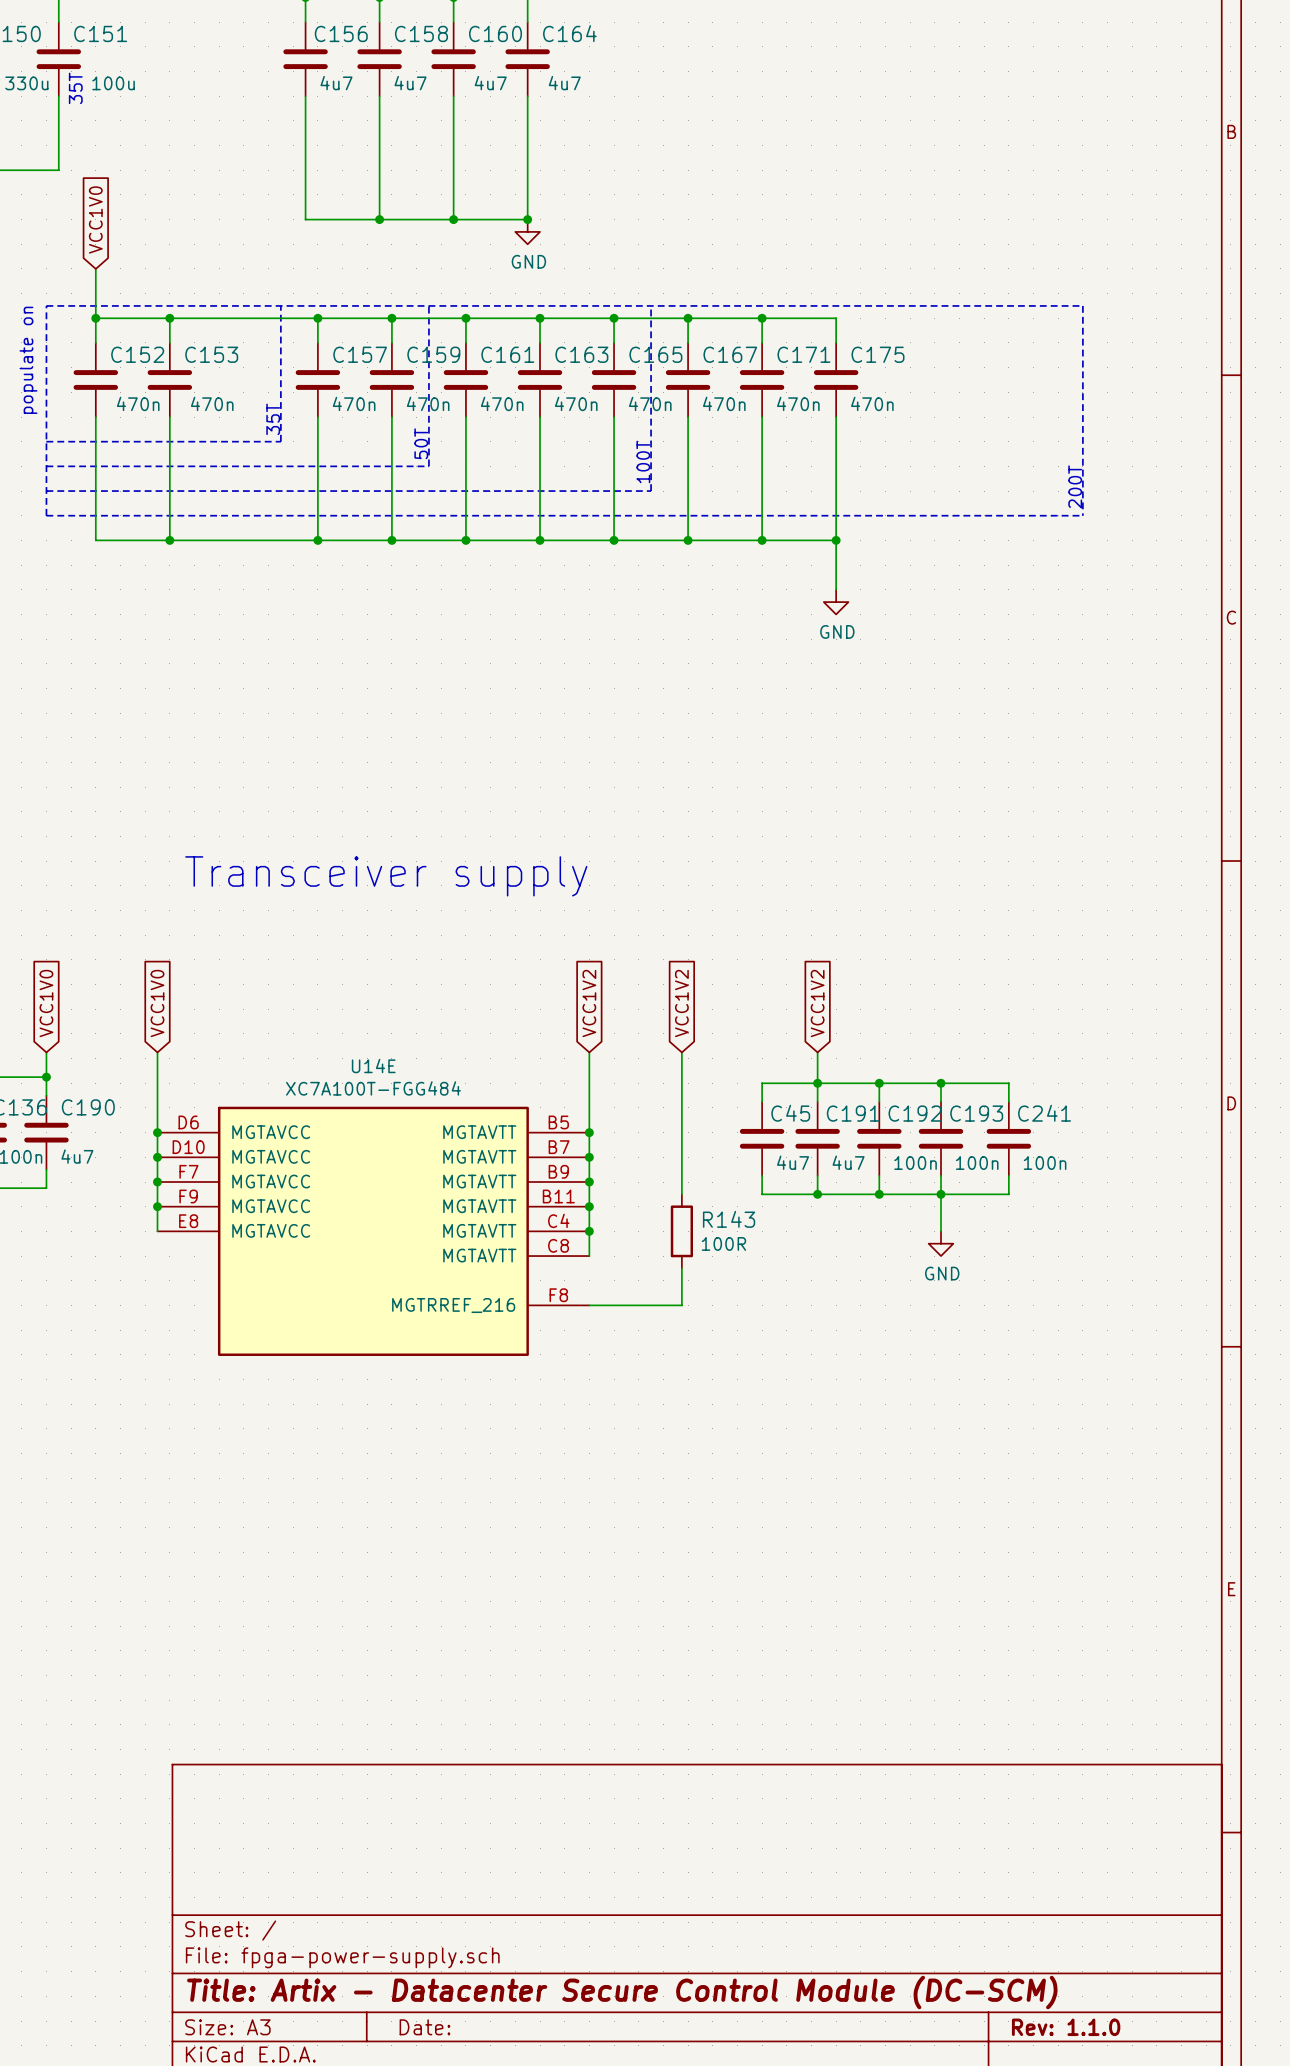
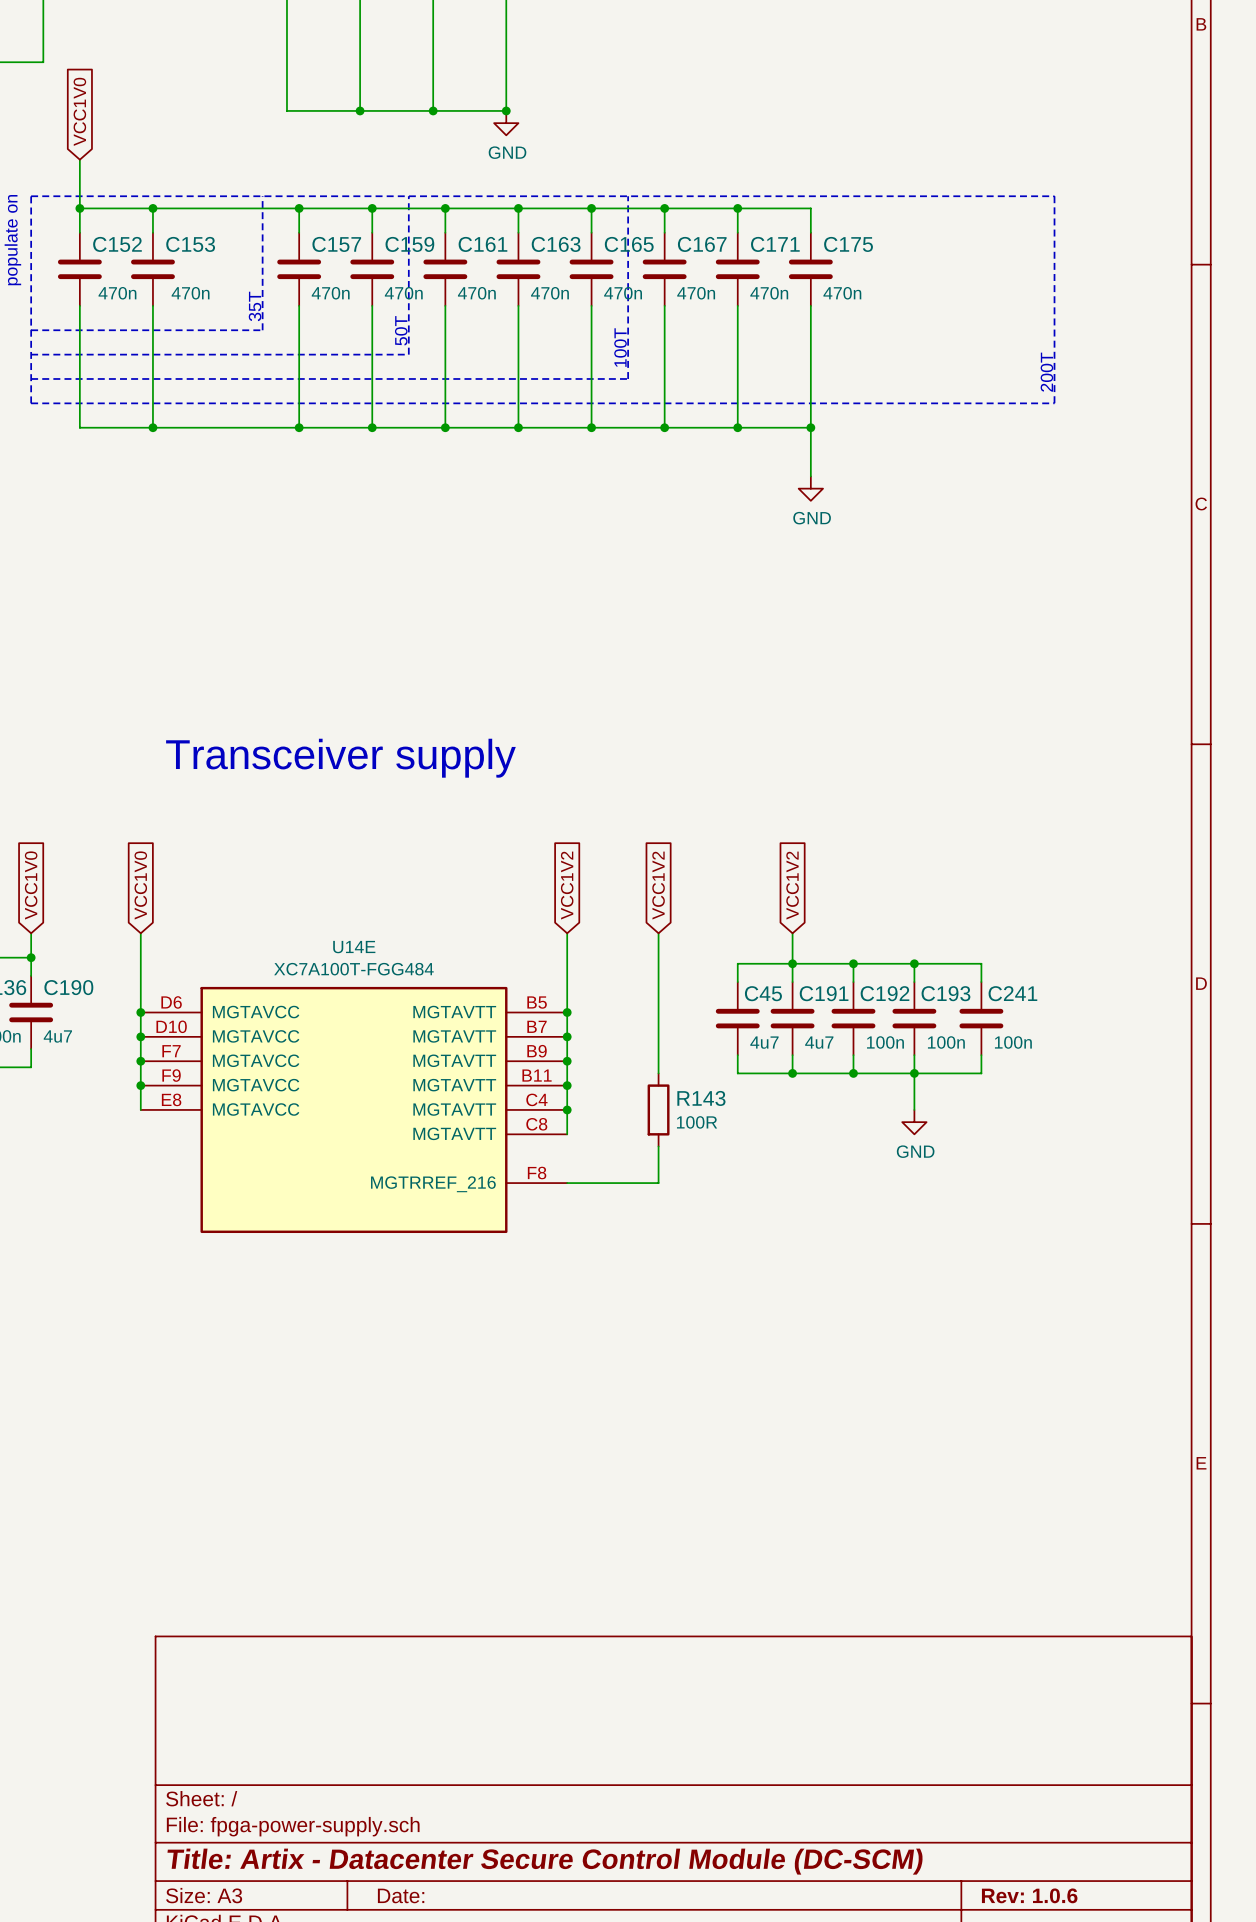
title block: Rev: 1.1.0 (1066, 2027) -> Rev: 1.0.6 (1029, 1895)

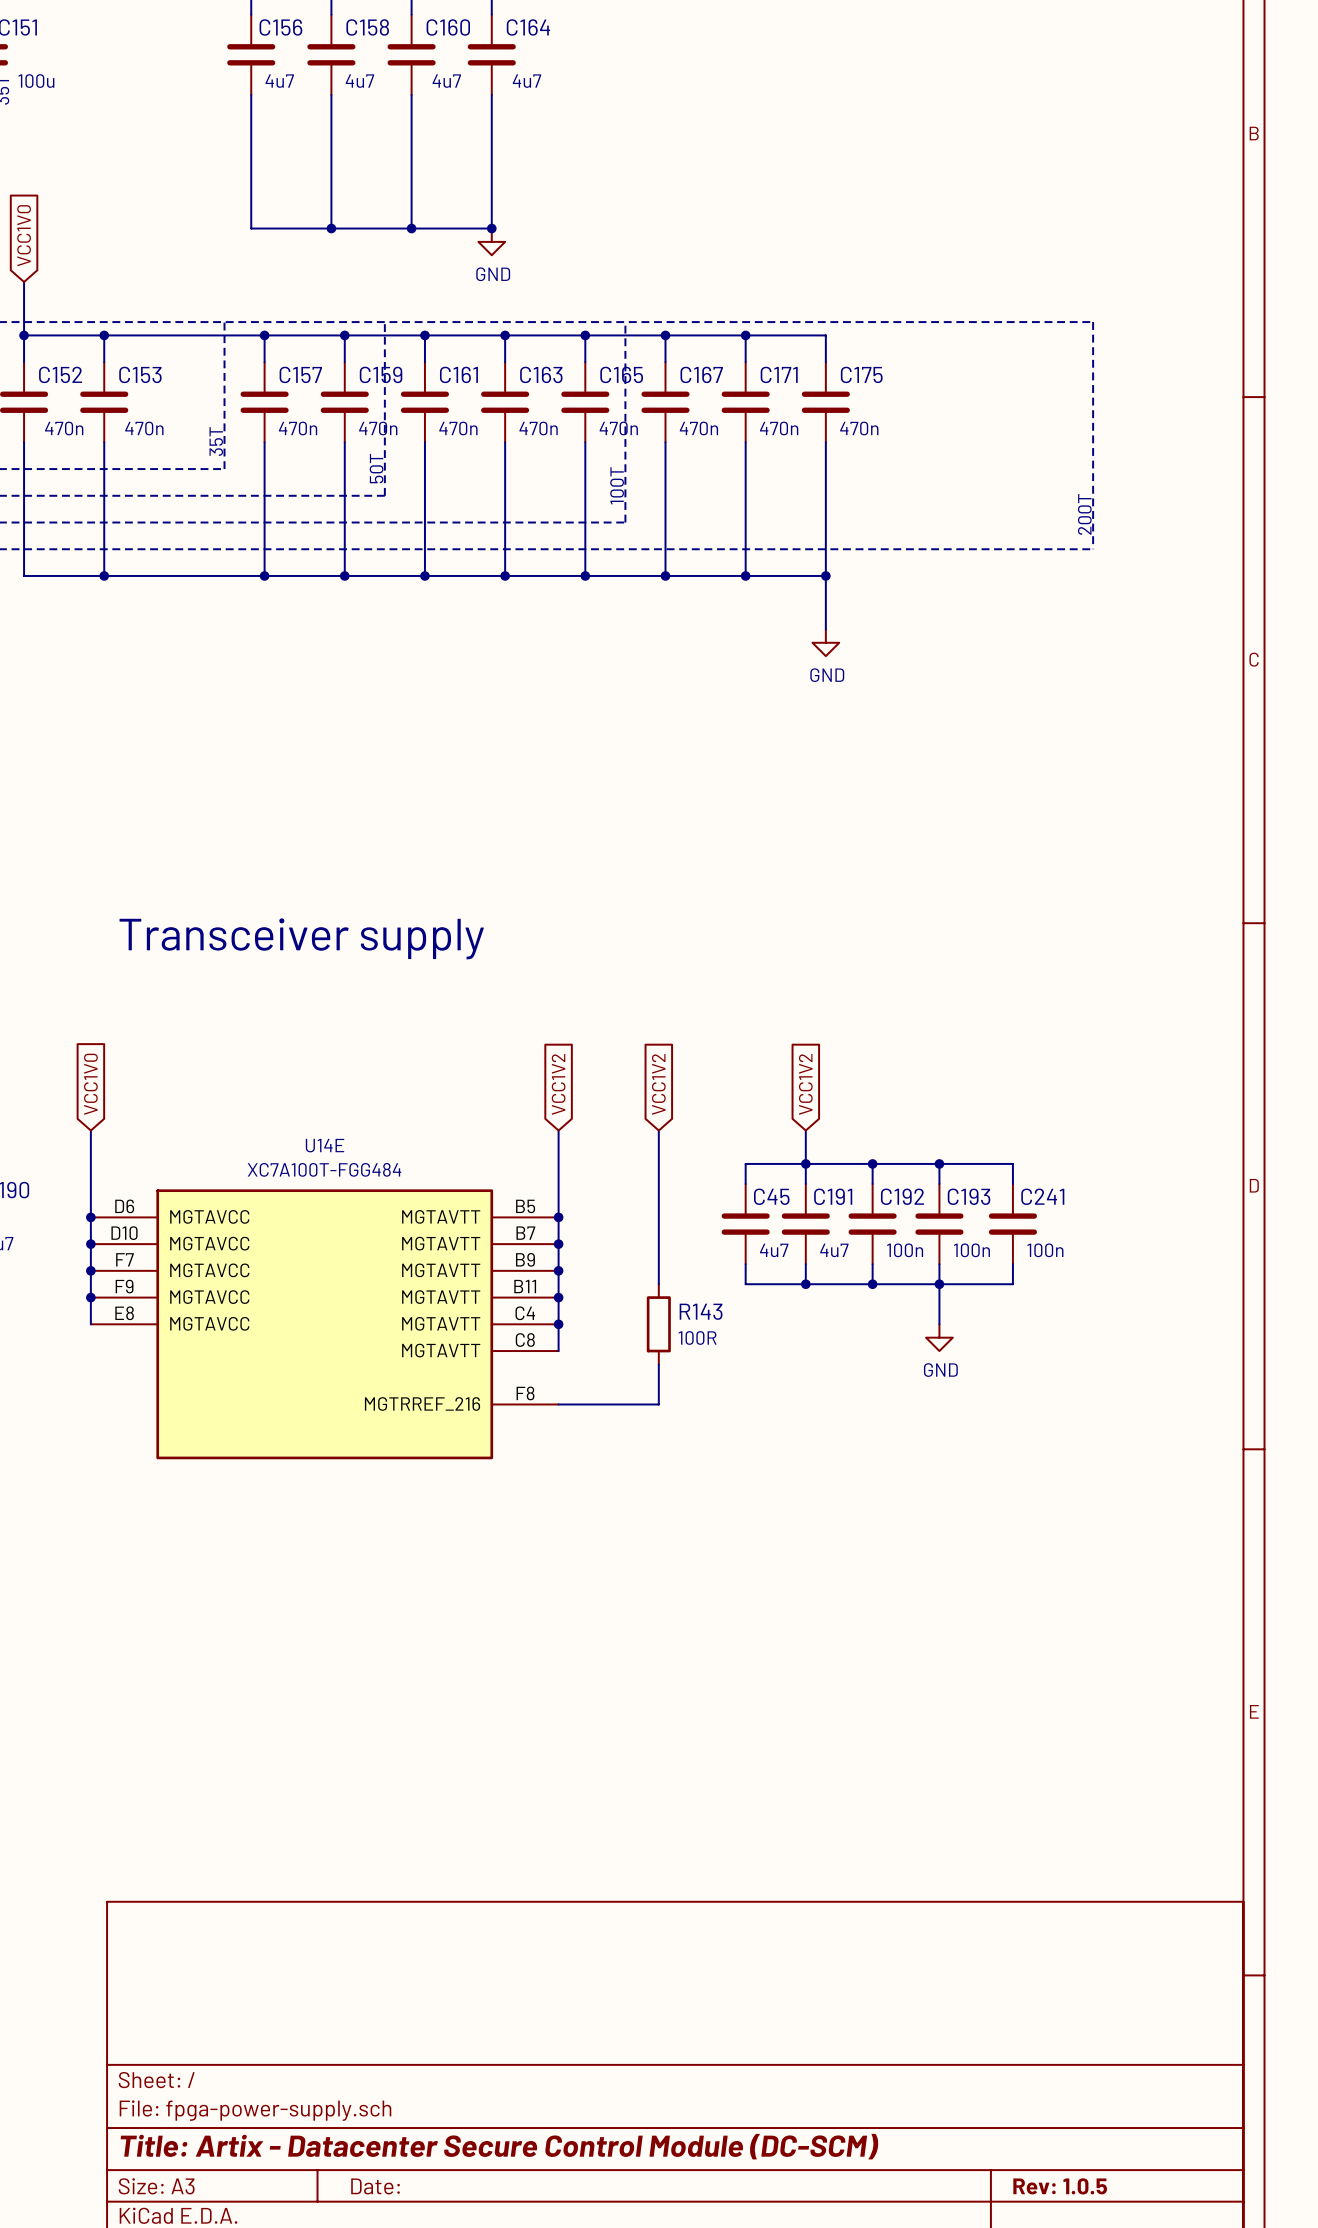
title block: Rev: 1.0.6 (1029, 1895) -> Rev: 1.0.5 (1060, 2186)

